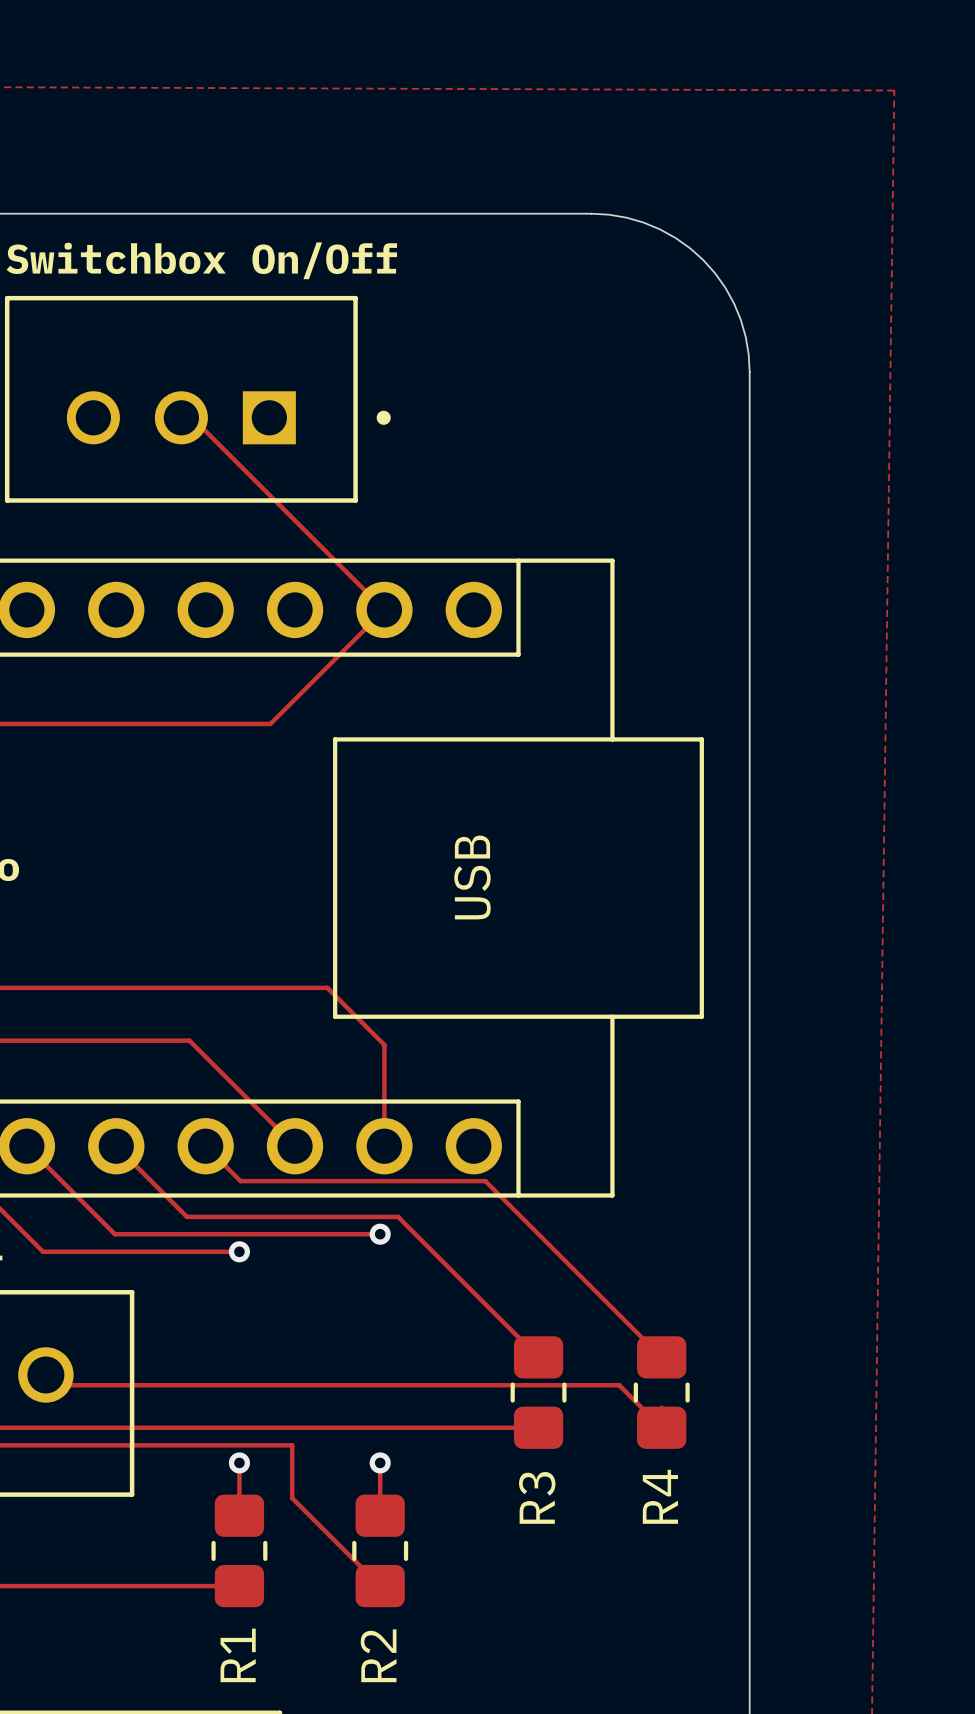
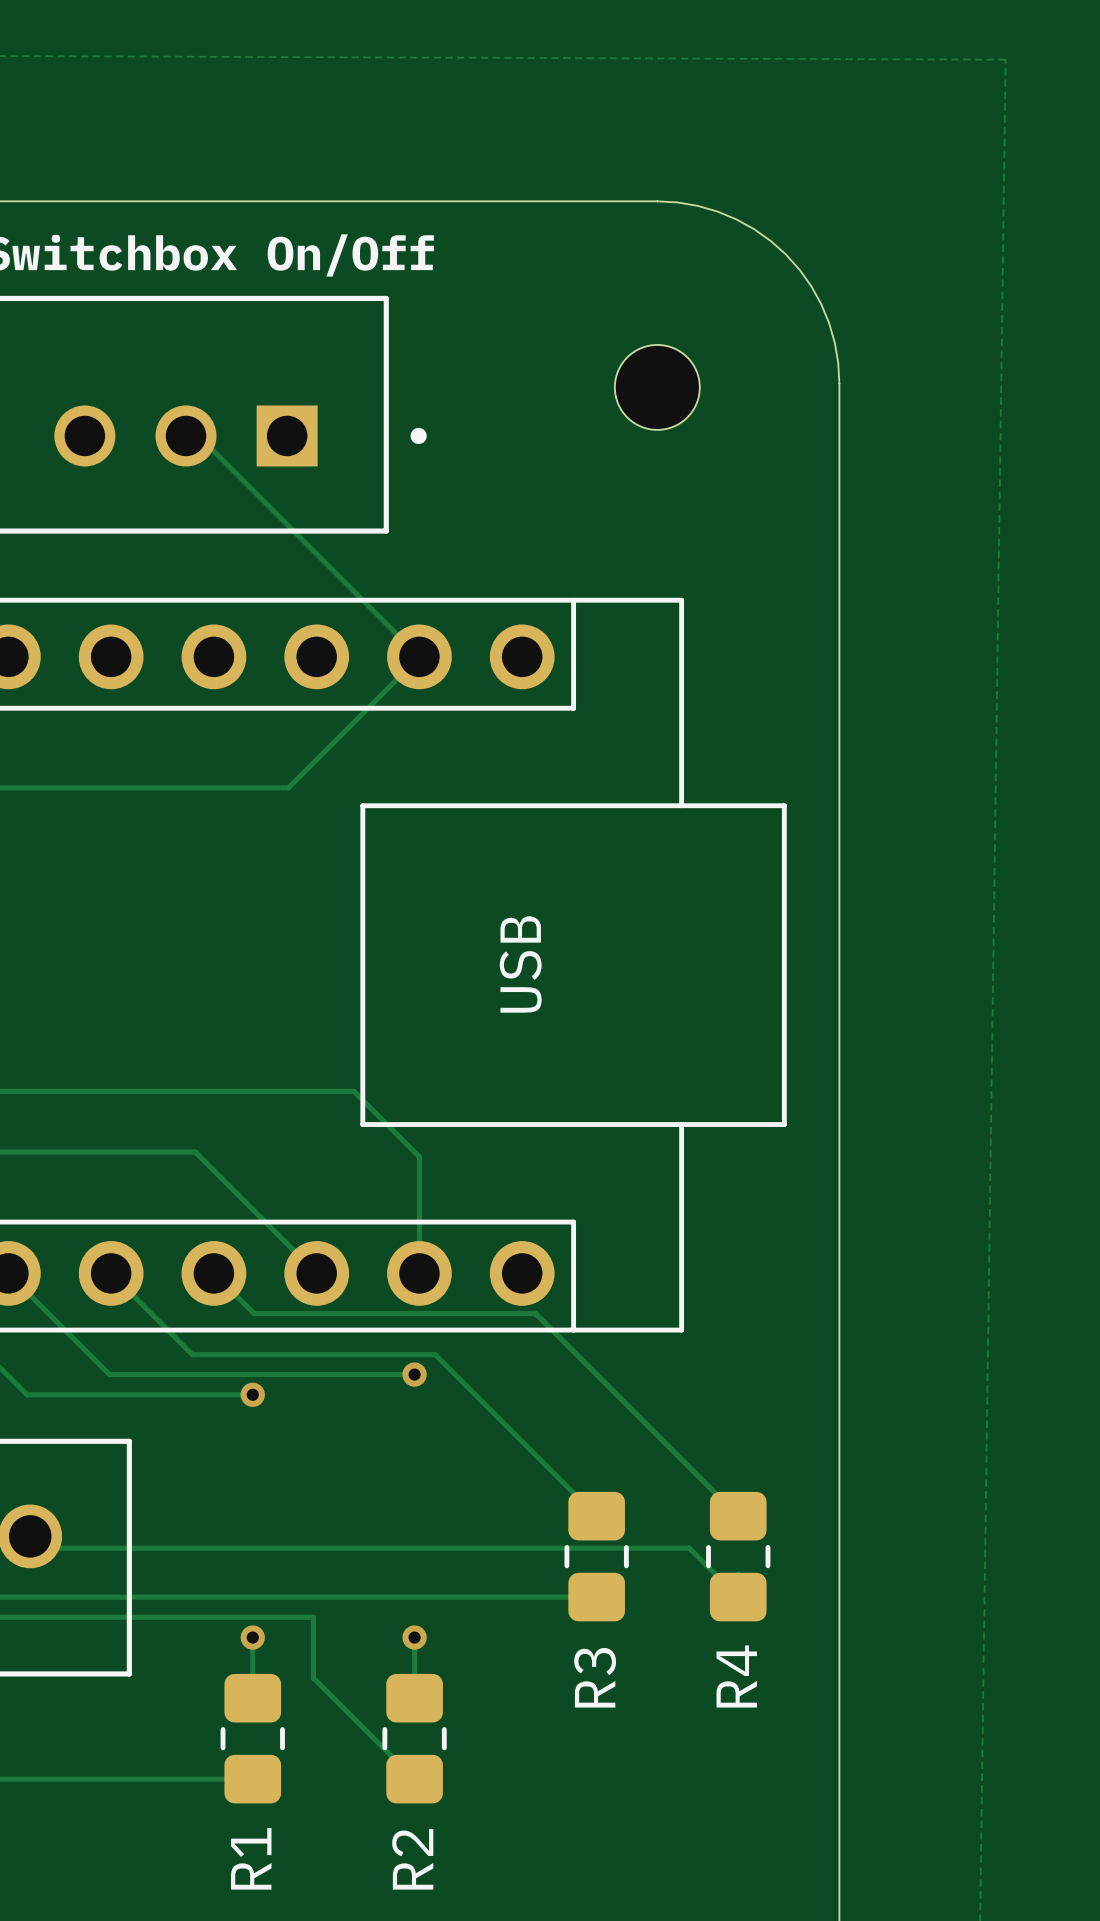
part: none -> (657, 387)

